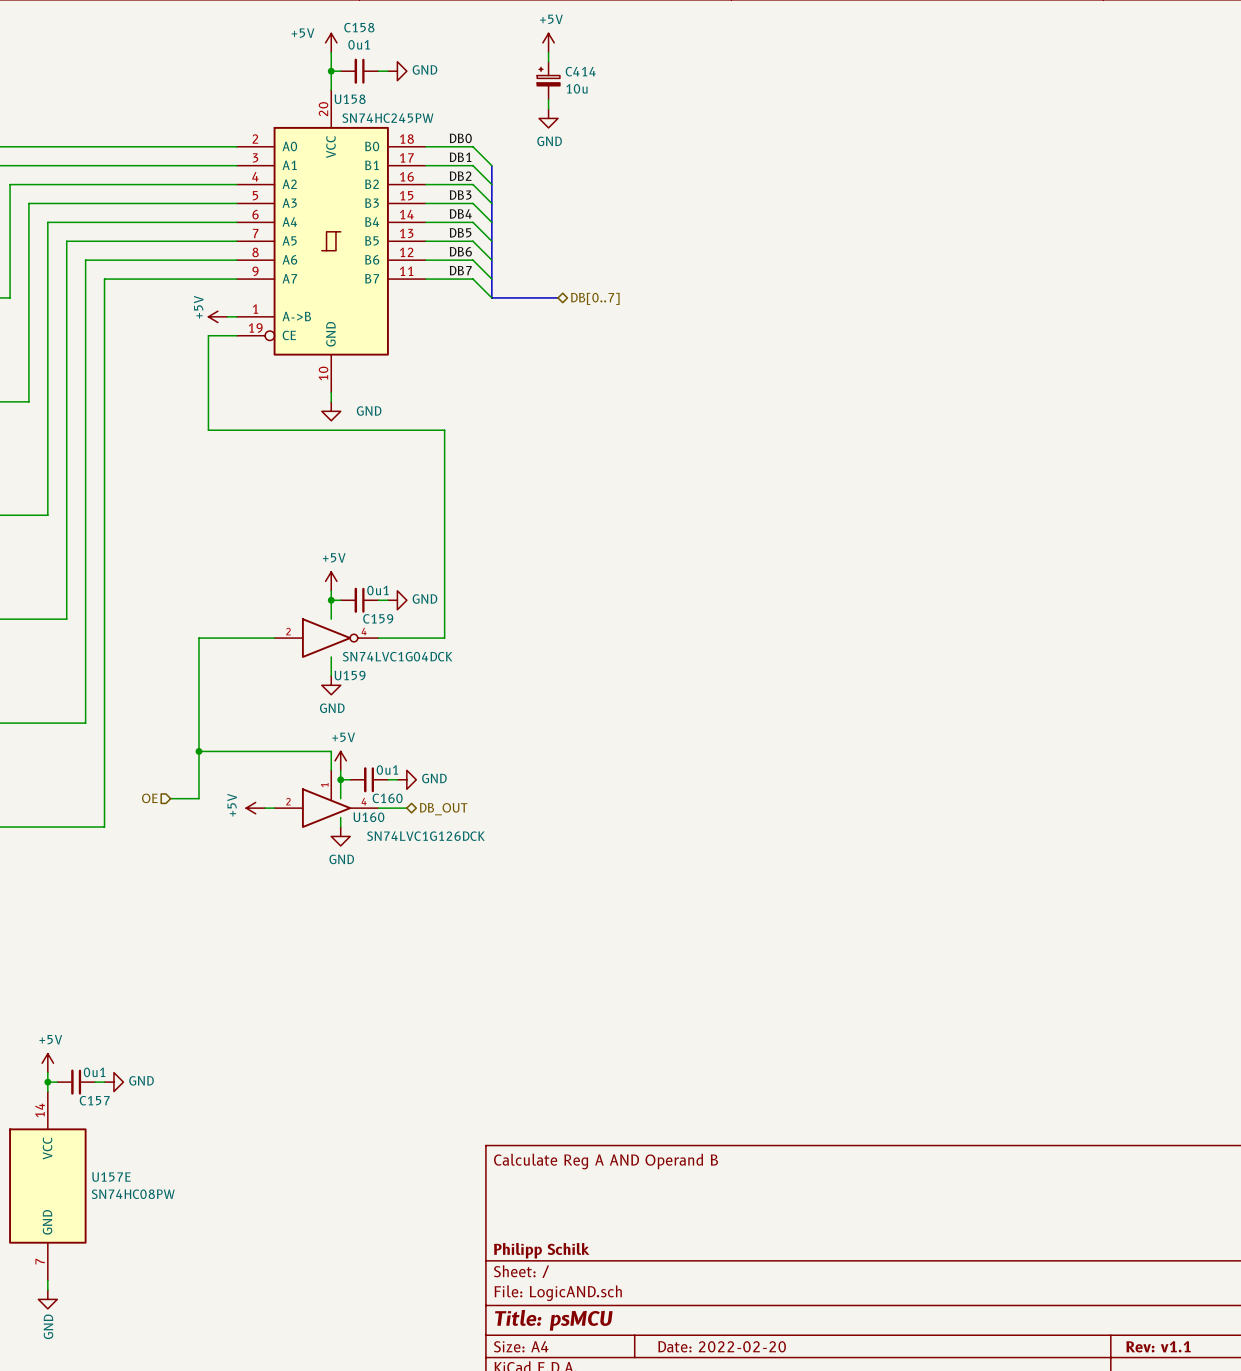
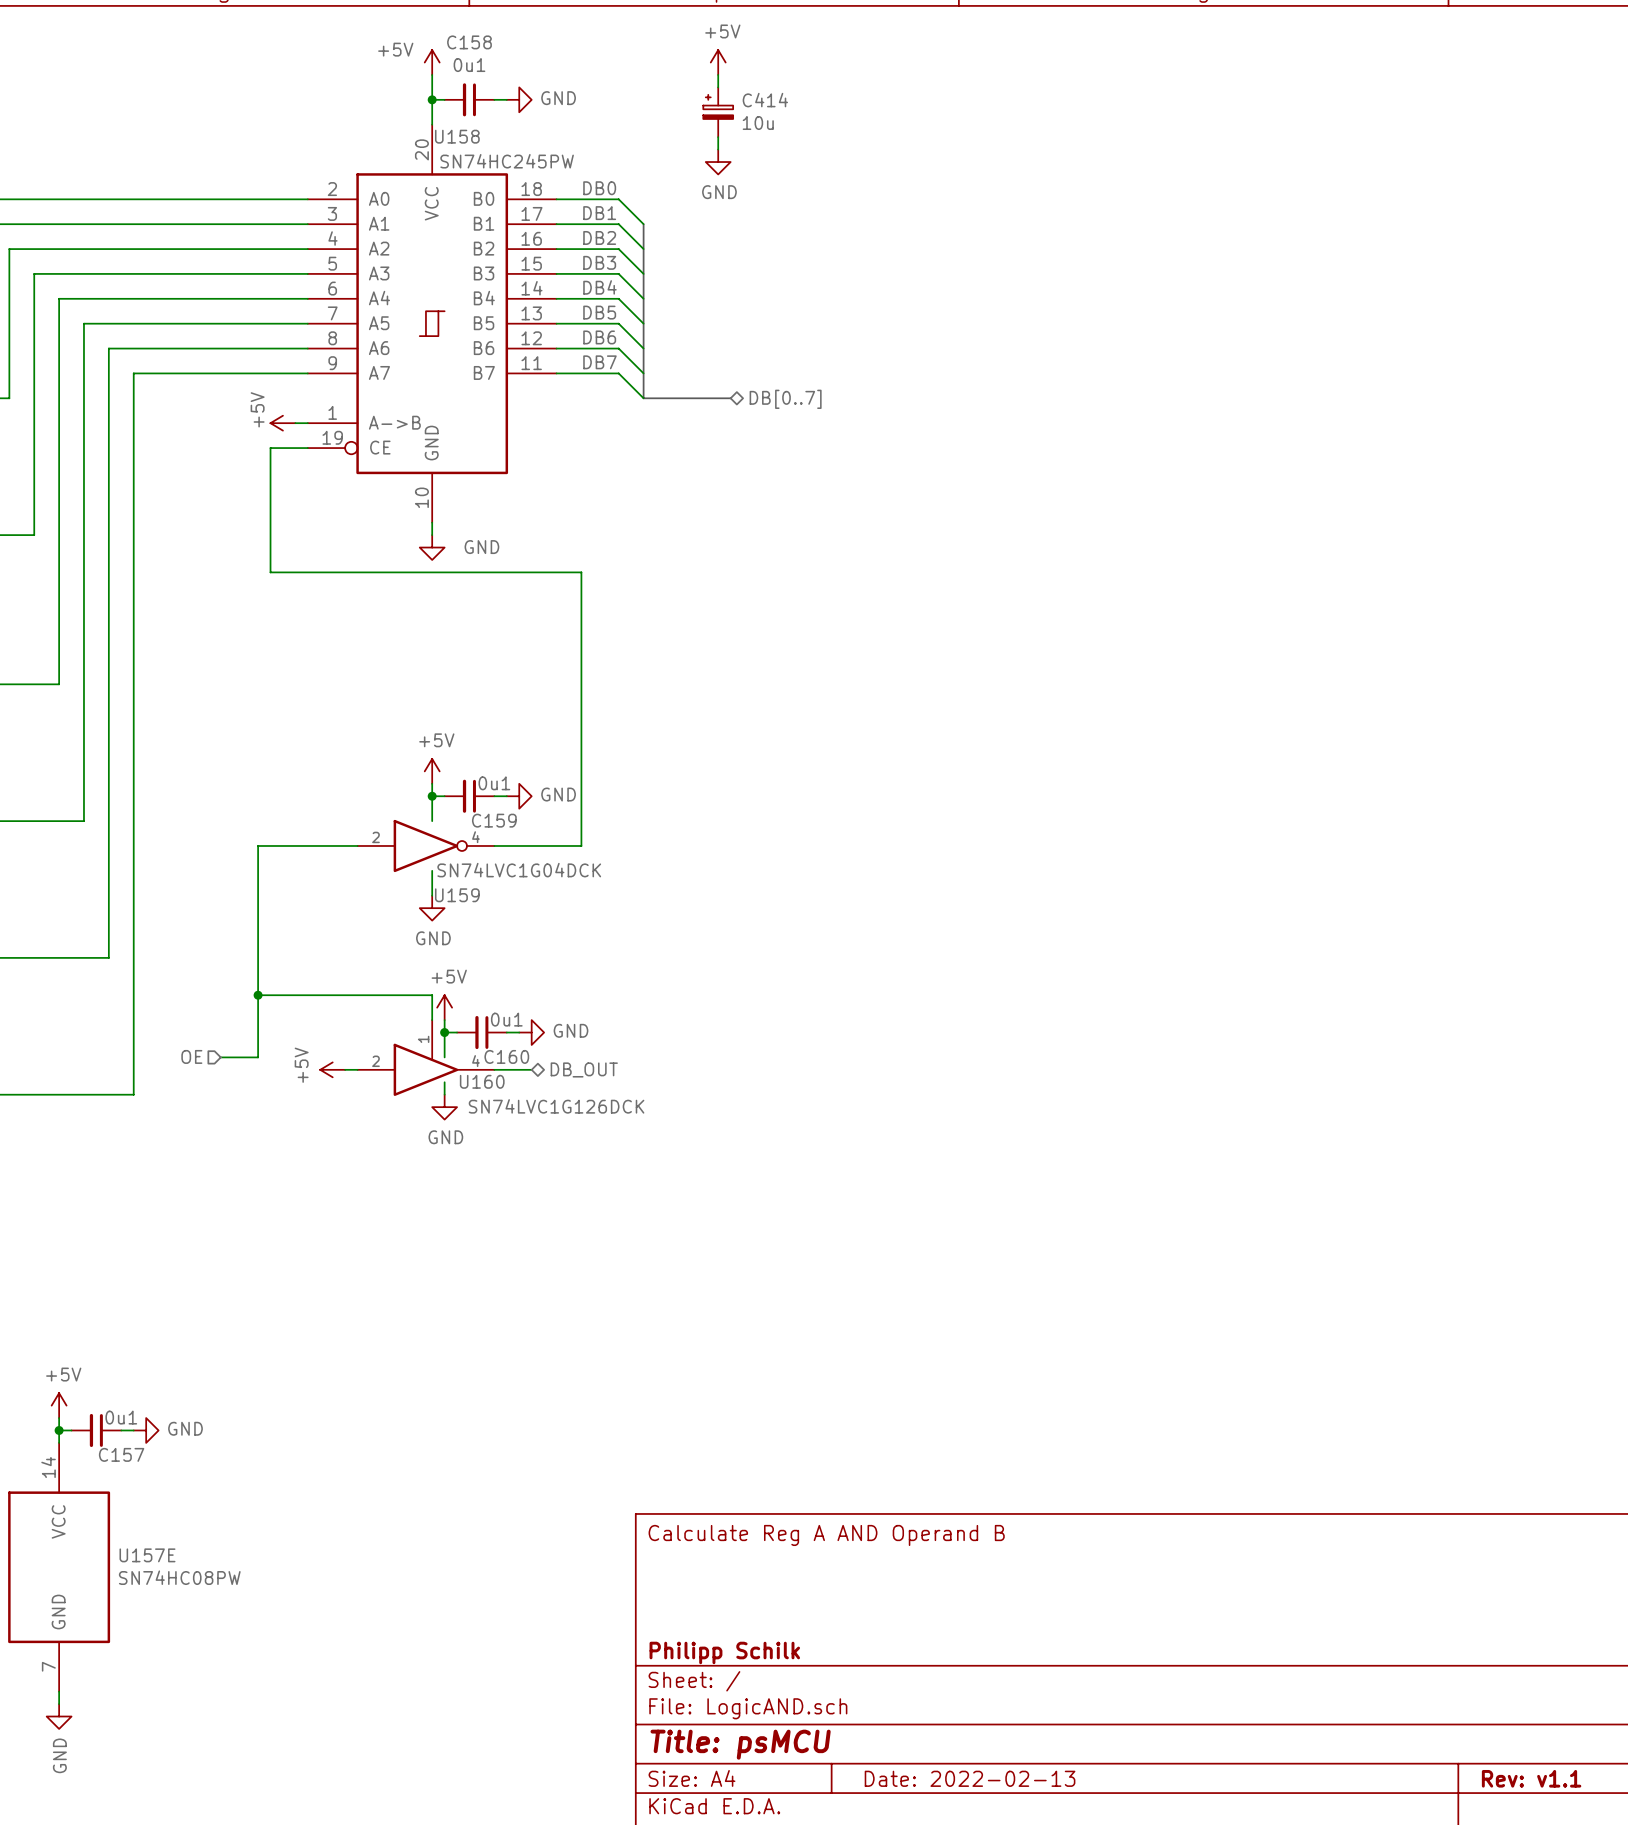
title block: Date: 2022-02-20 (722, 1346) -> Date: 2022-02-13 (970, 1778)

